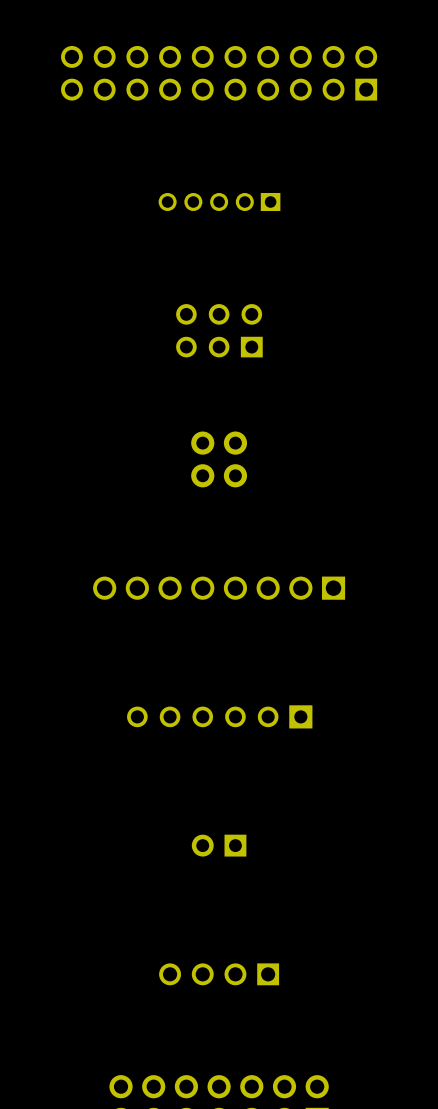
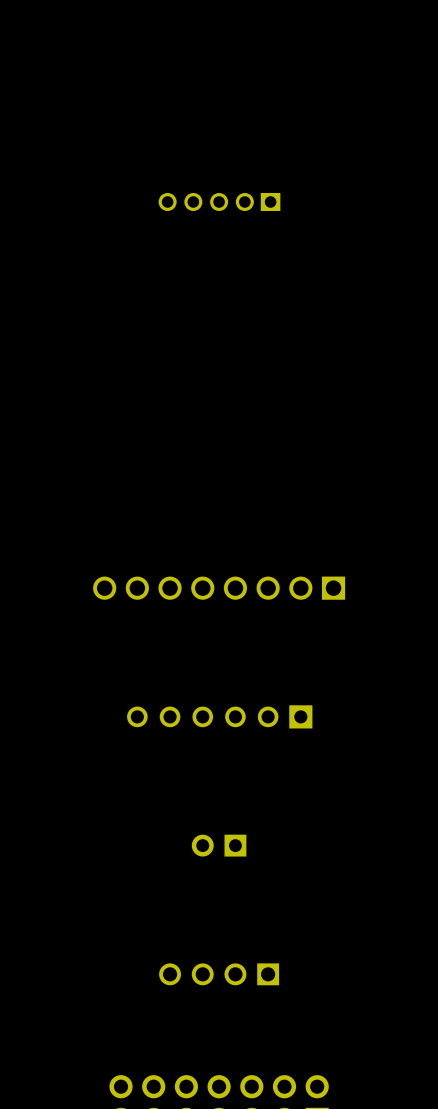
part: (219, 73) -> none
part: (219, 330) -> none
part: (219, 459) -> none

